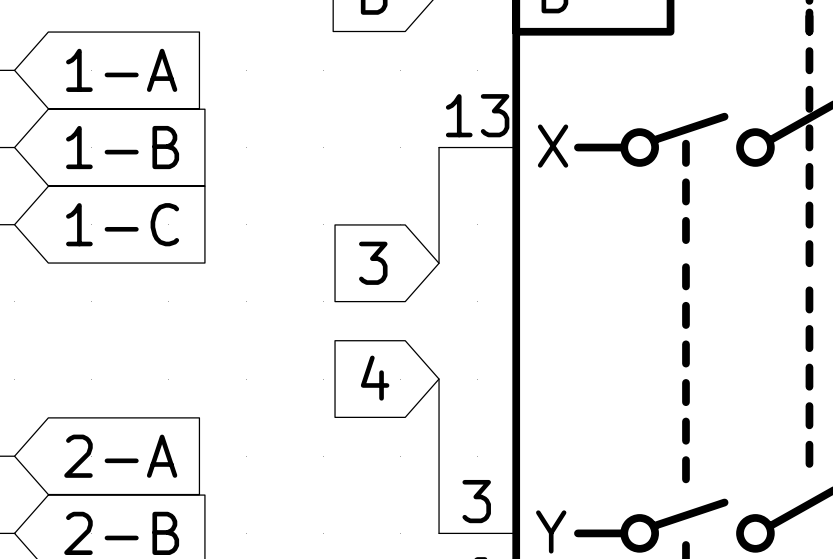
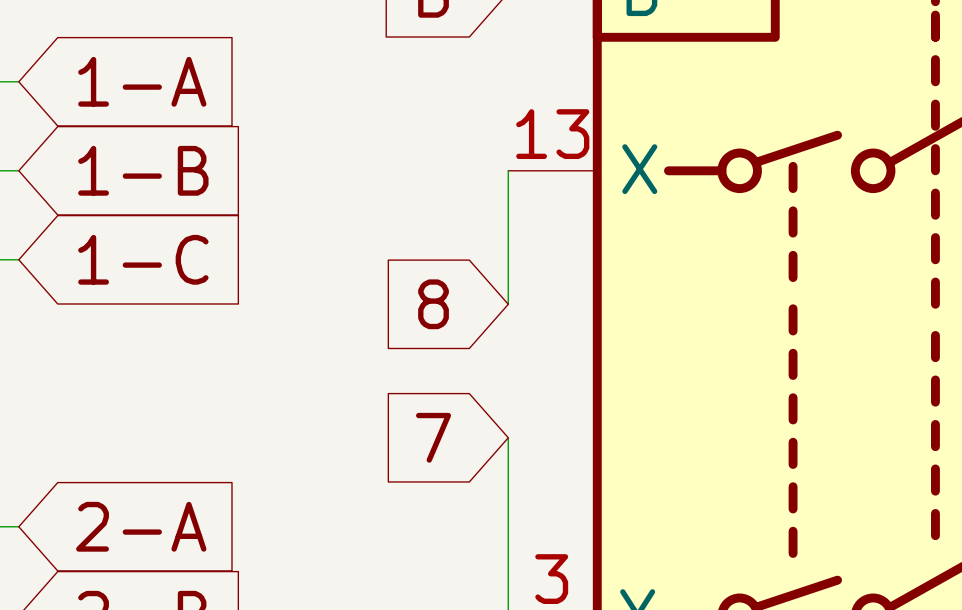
global label: 3 (373, 263) -> 8 (433, 304)
global label: 4 (375, 378) -> 7 (433, 437)

